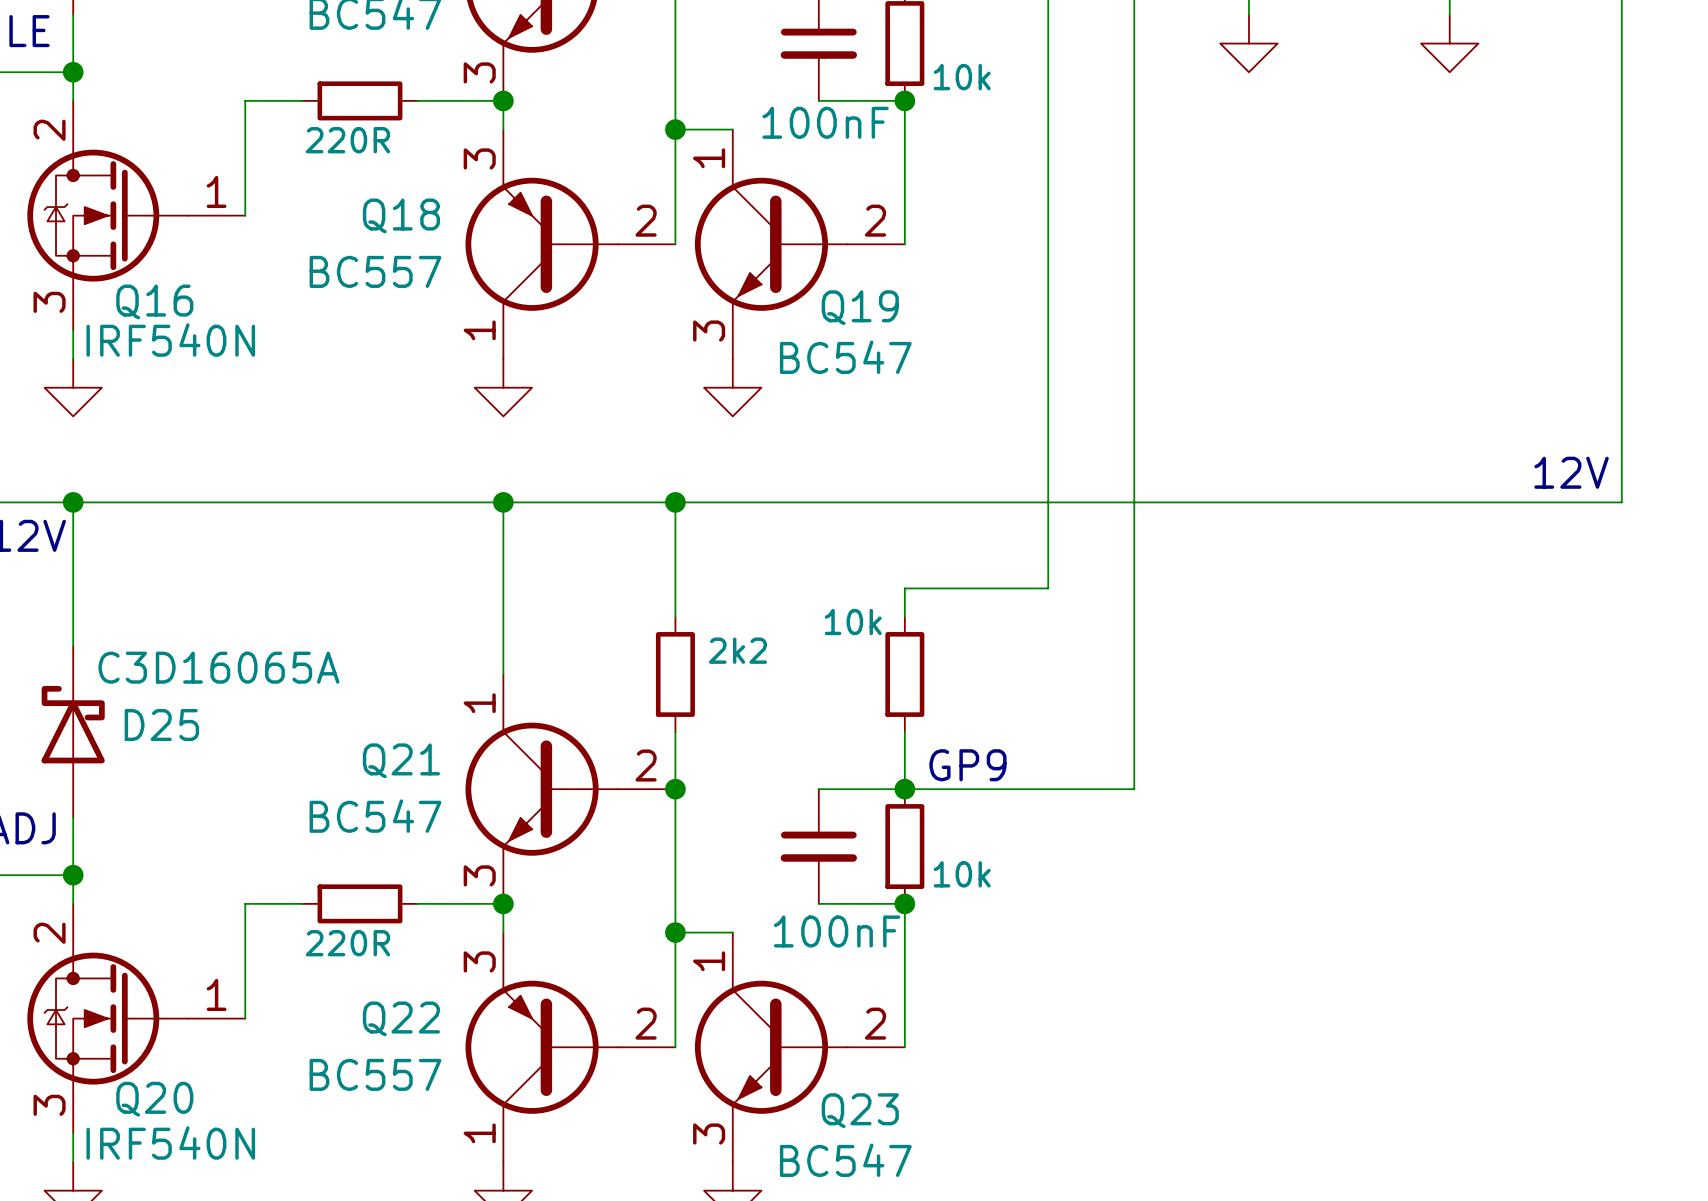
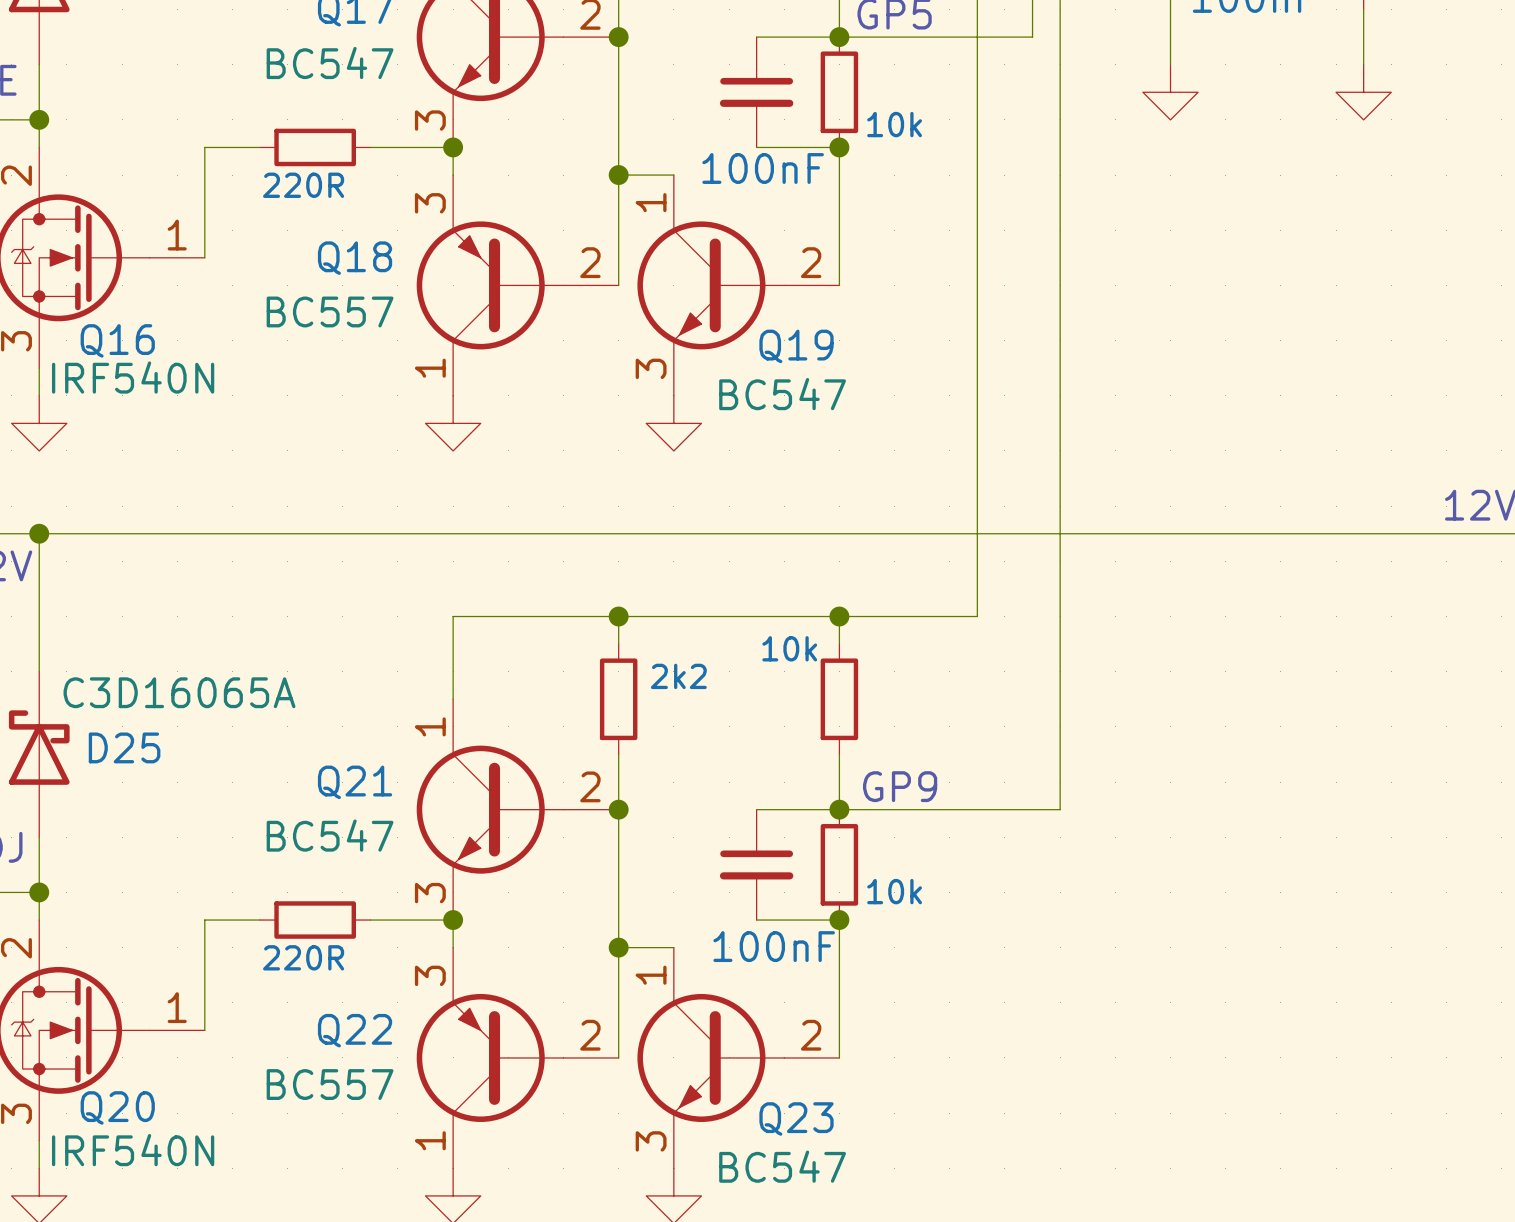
wire: (503, 502) (503, 588) -> (839, 616) (453, 616)
junction: (503, 502) -> none
wire: (675, 502) (675, 588) -> none
junction position: (675, 502) -> (618, 616)
junction: none -> (839, 616)

